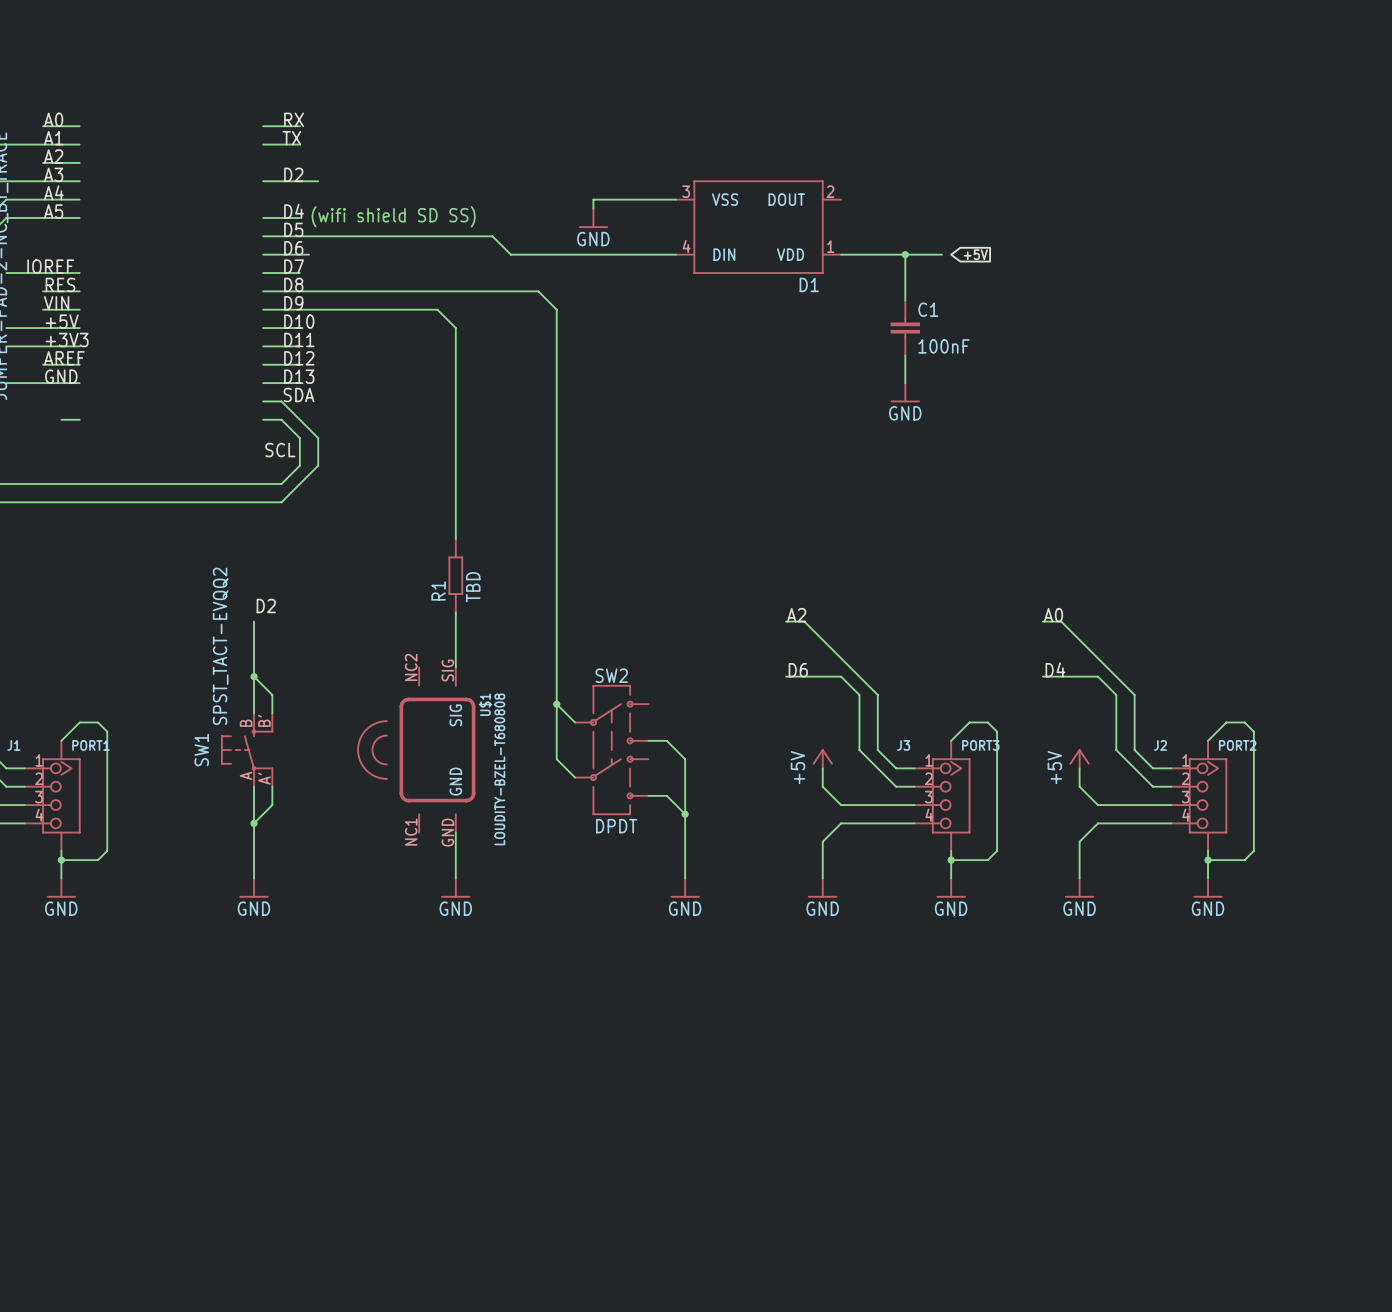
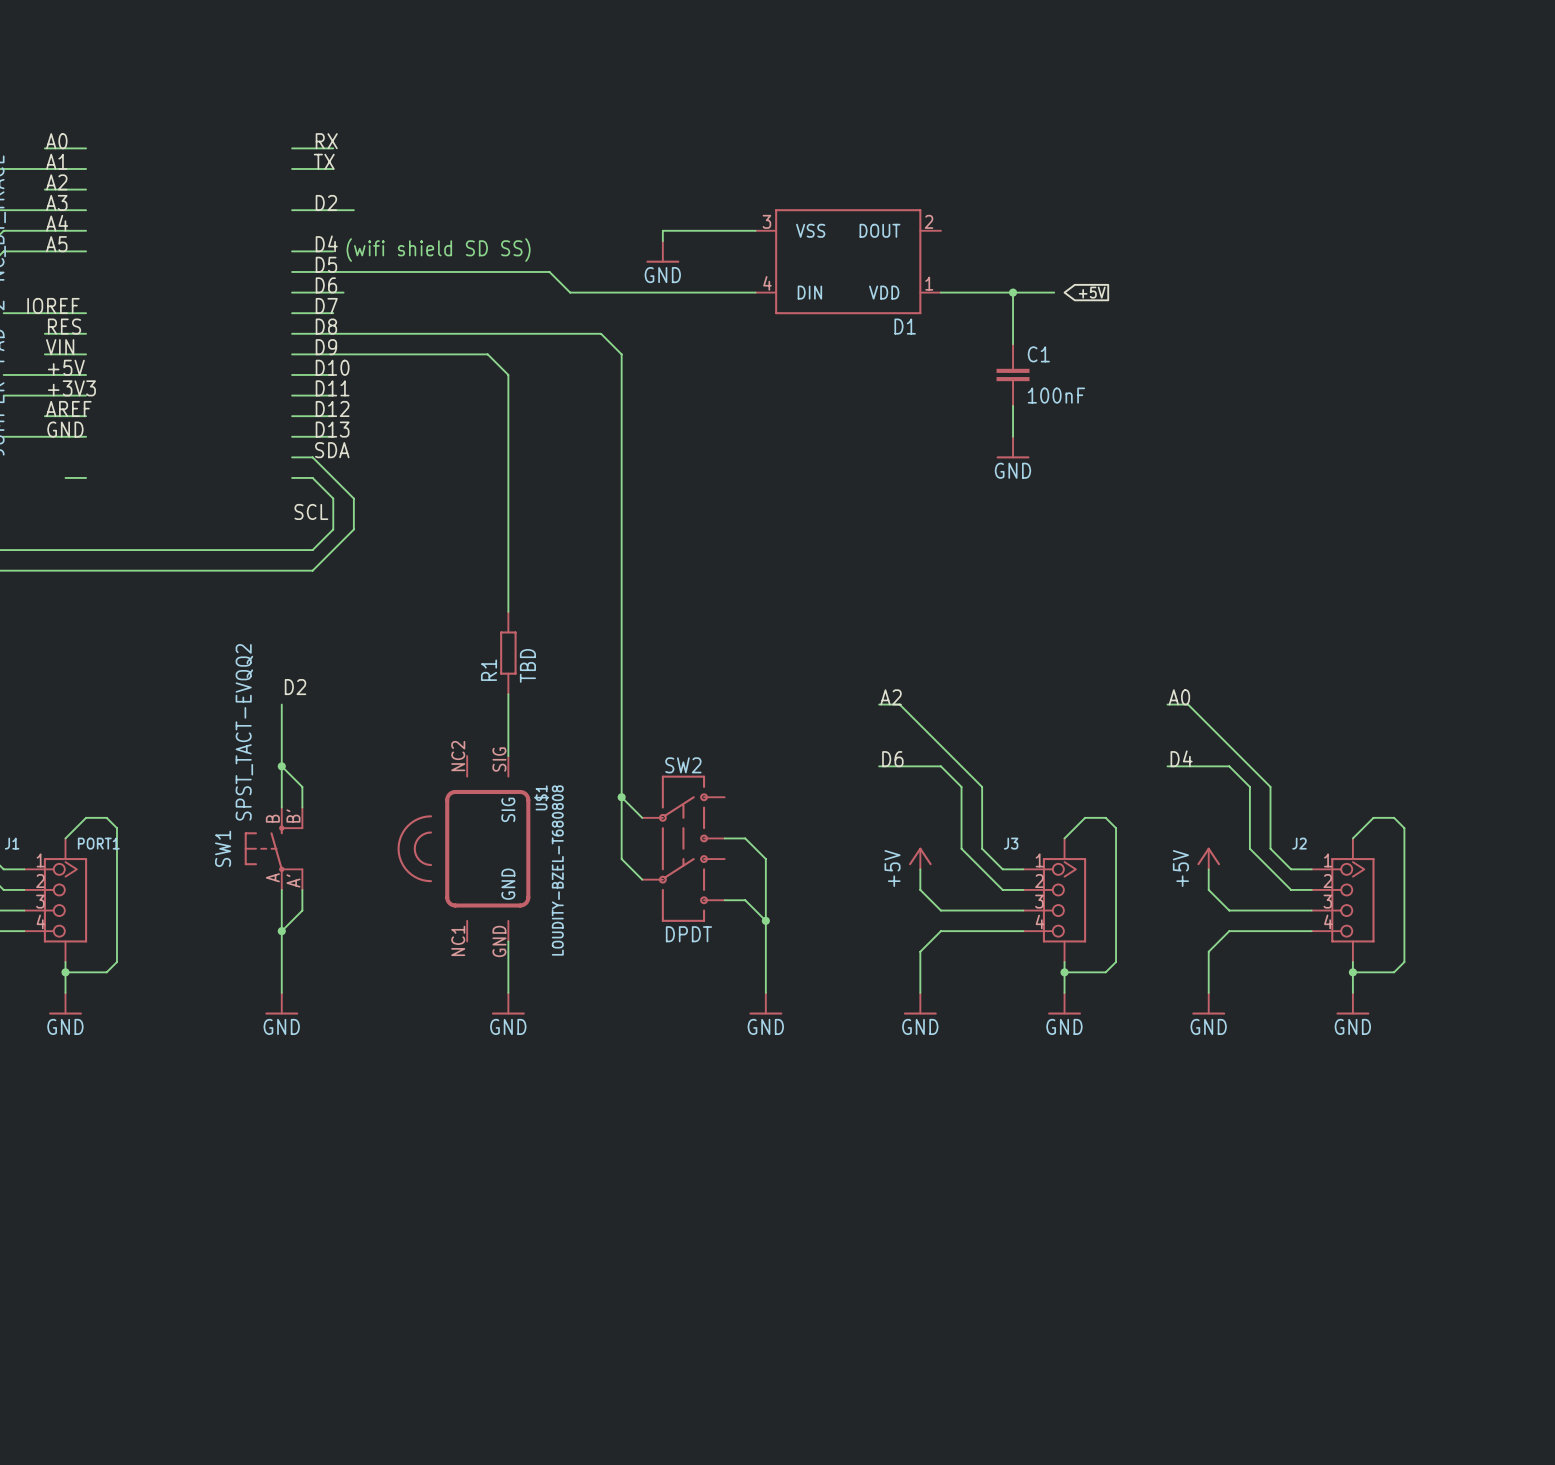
J3 value: PORT3 (980, 745) -> none
J2 value: PORT2 (1237, 745) -> none

